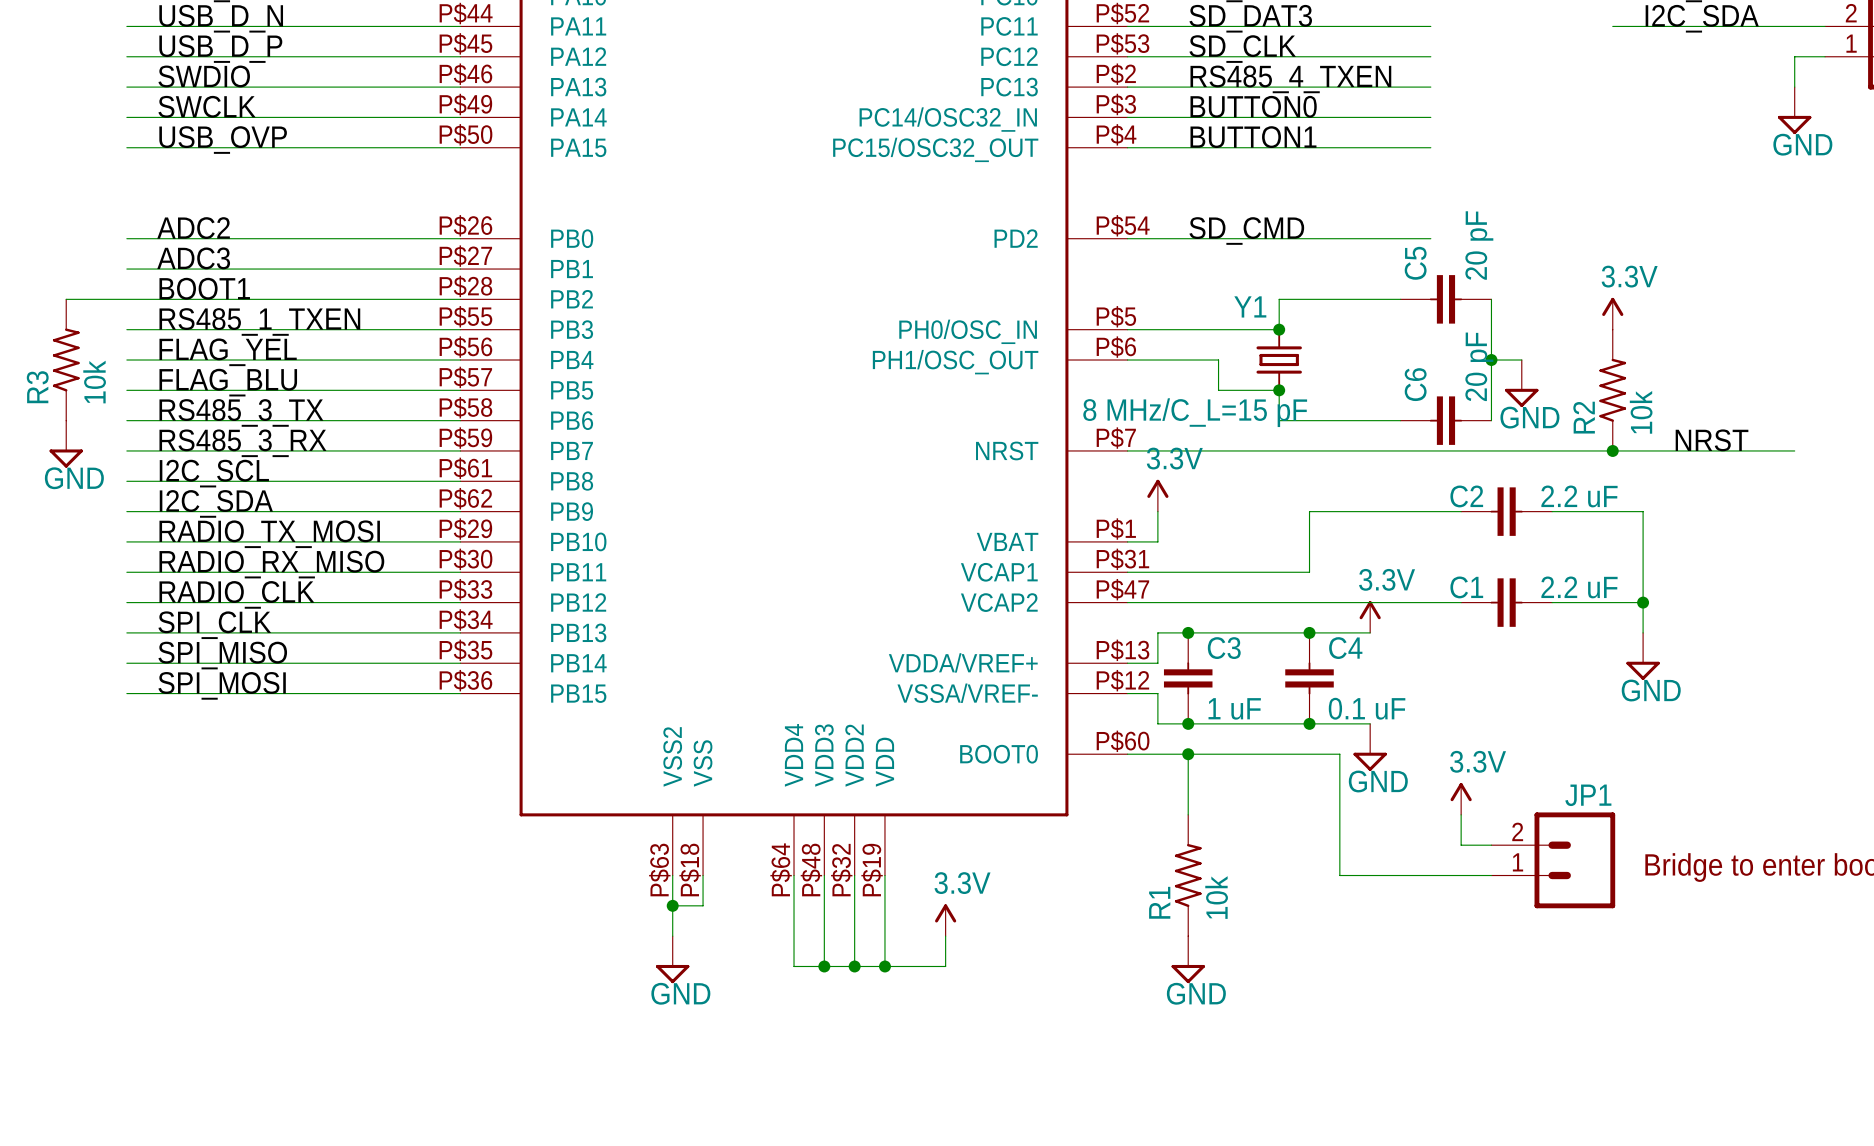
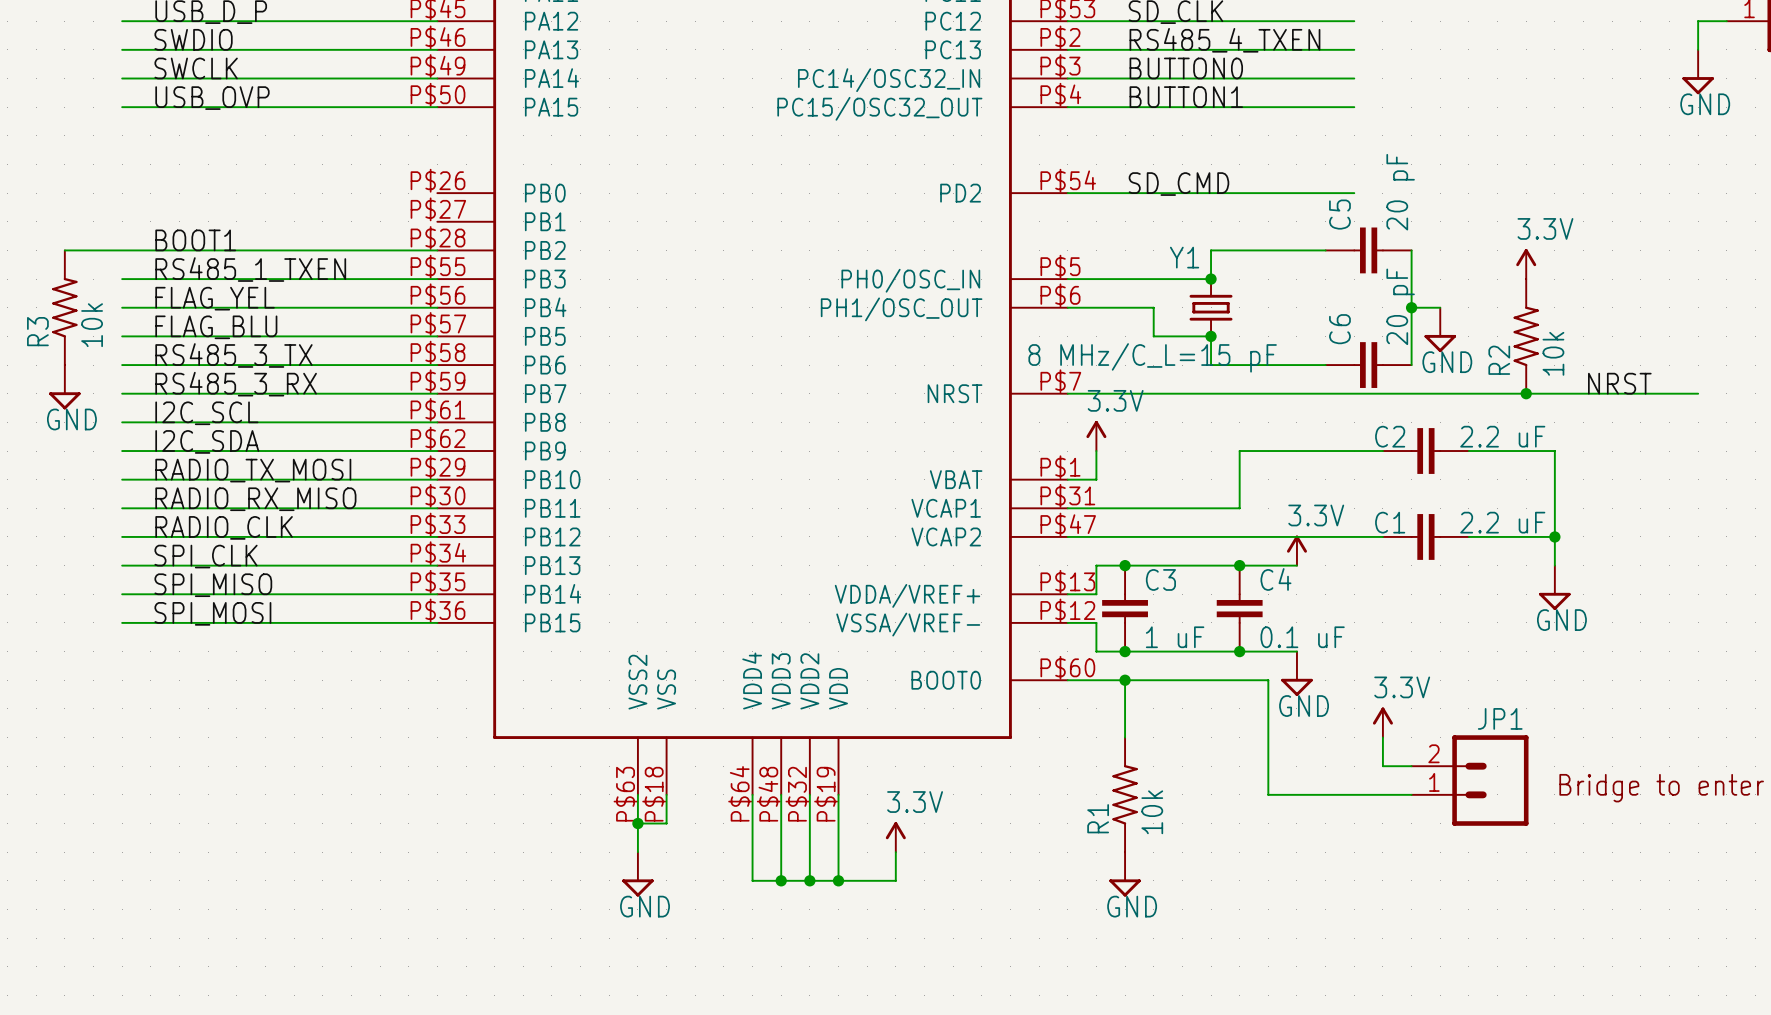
label: ADC2 (193, 228) -> none
wire: (126, 238) (460, 238) -> none
label: ADC3 (193, 258) -> none
wire: (126, 269) (460, 269) -> none

